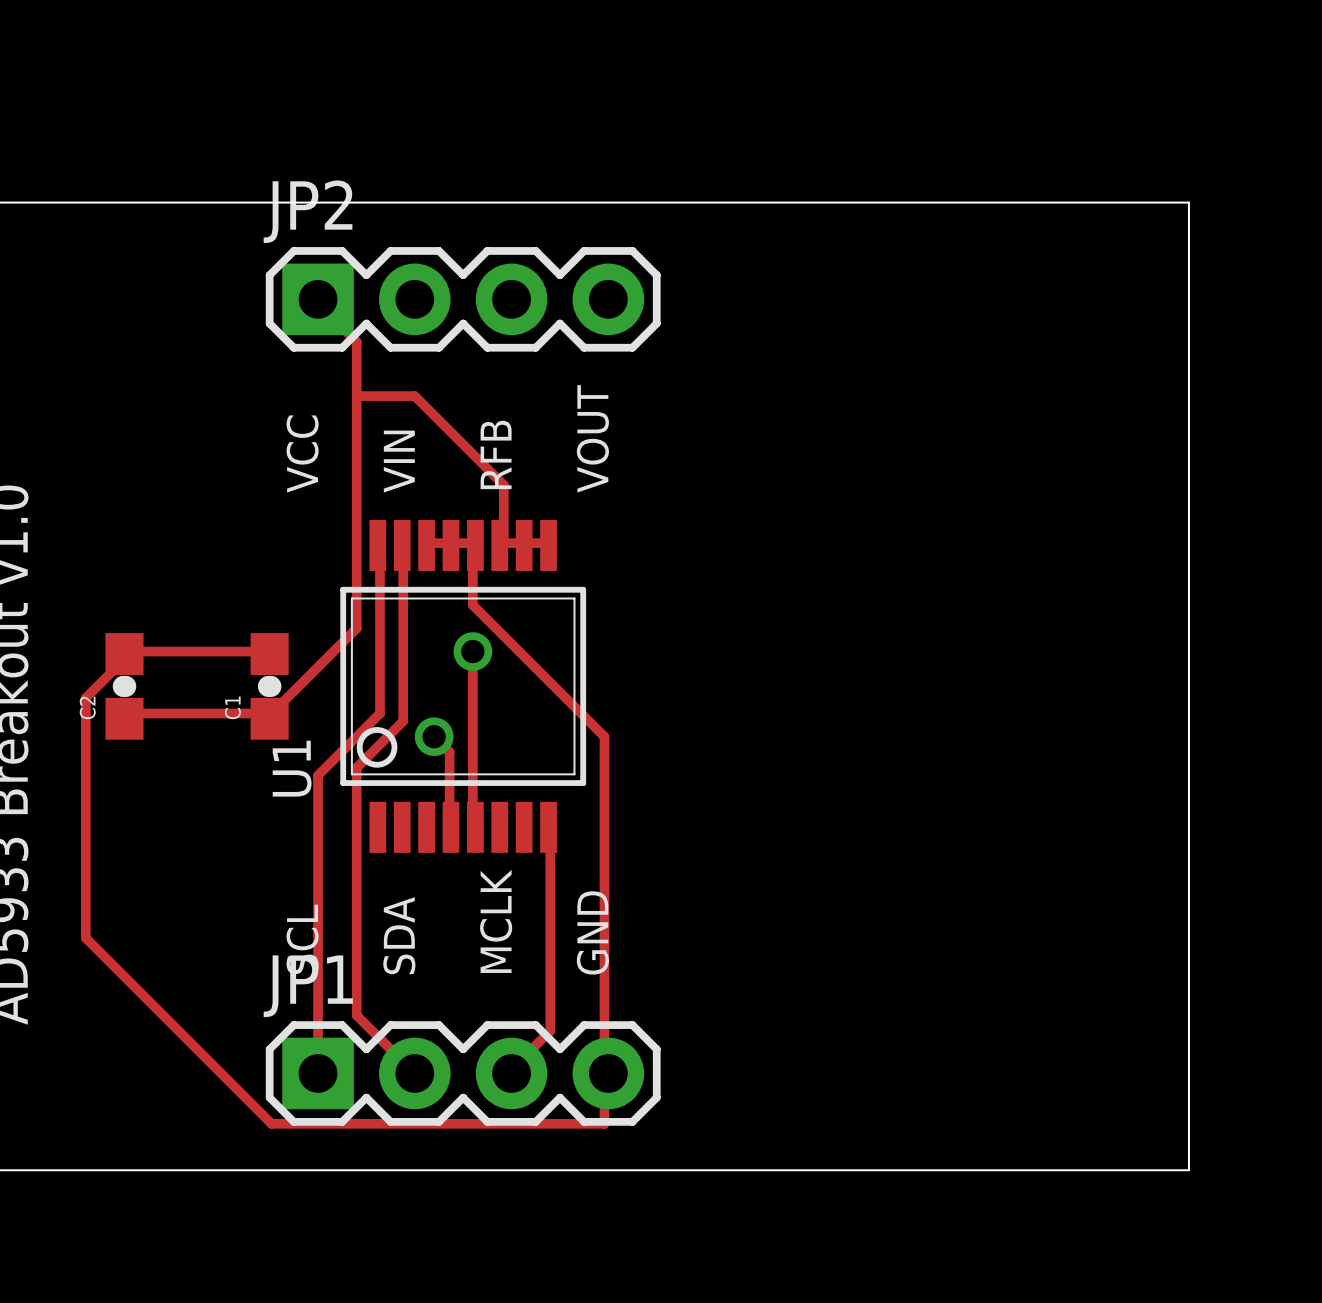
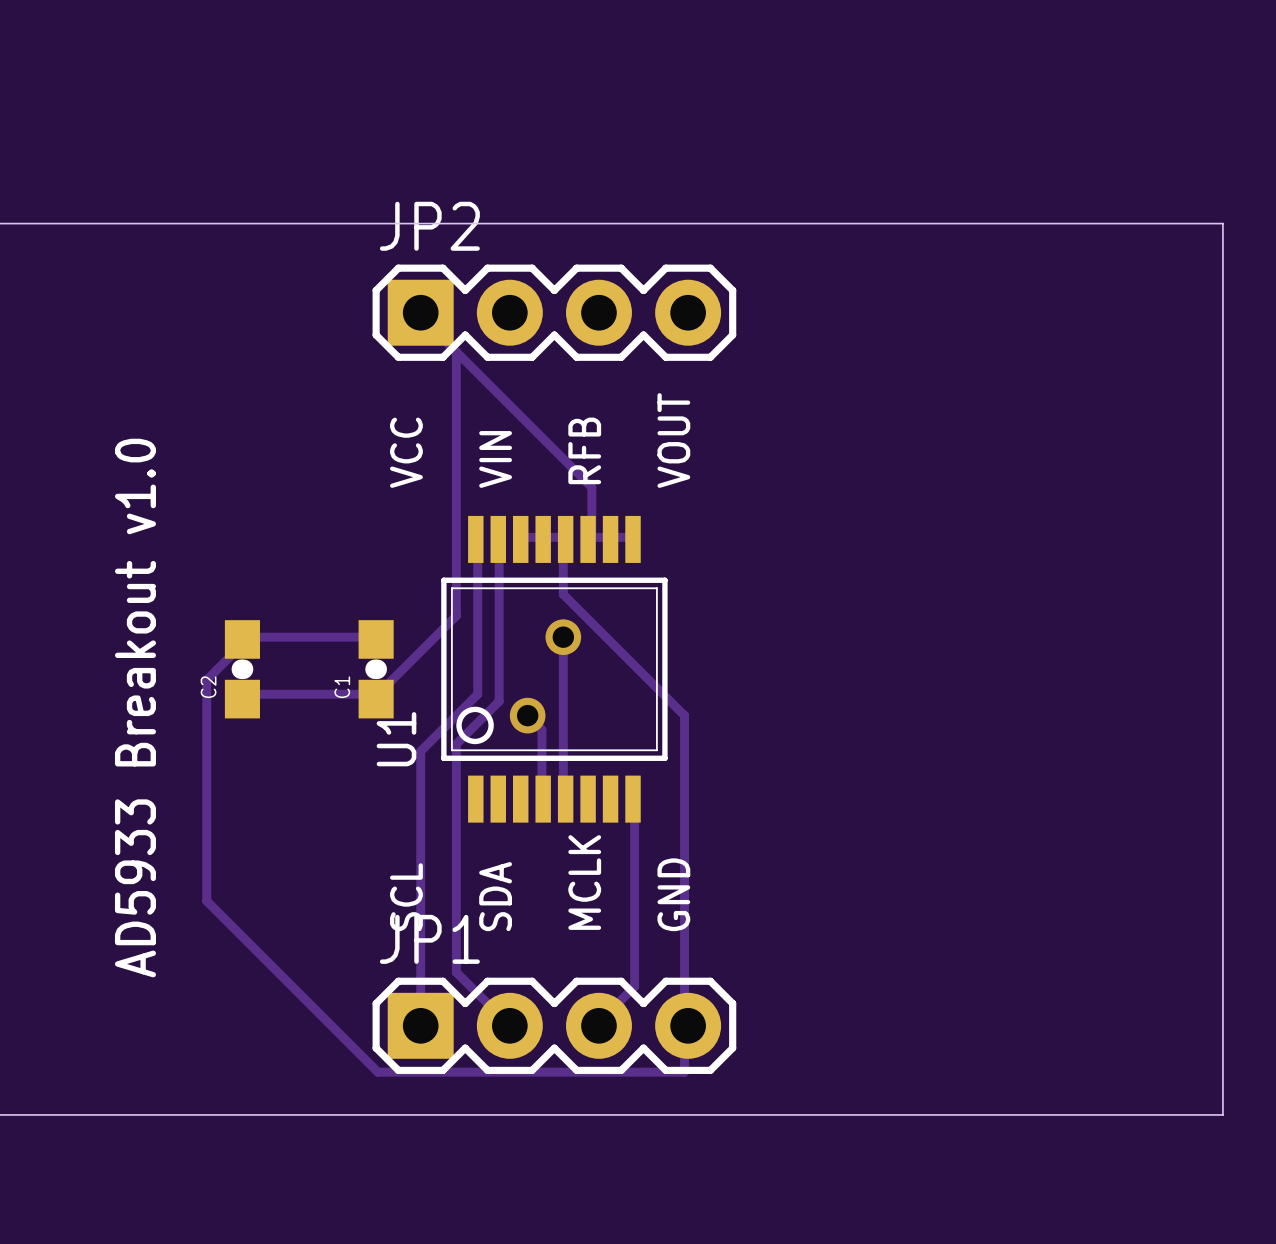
track: (356, 396) (414, 396) (503, 485) (503, 489) -> (456, 351) (591, 487)

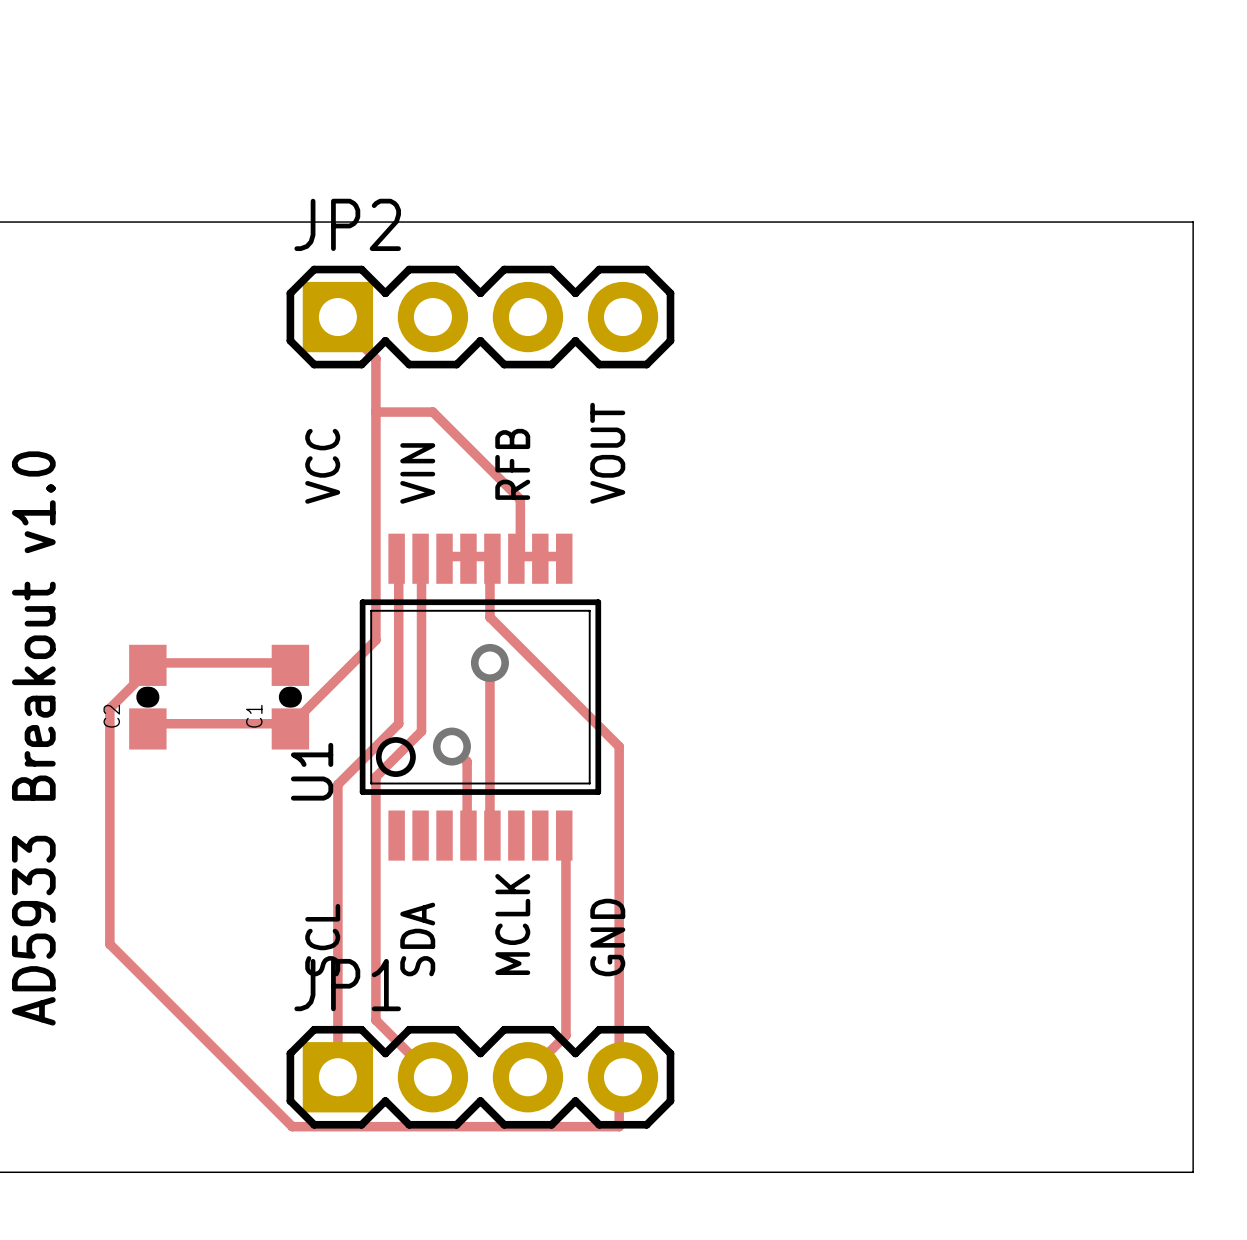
track: (456, 351) (591, 487) -> (375, 412) (432, 412) (520, 499) (520, 503)

